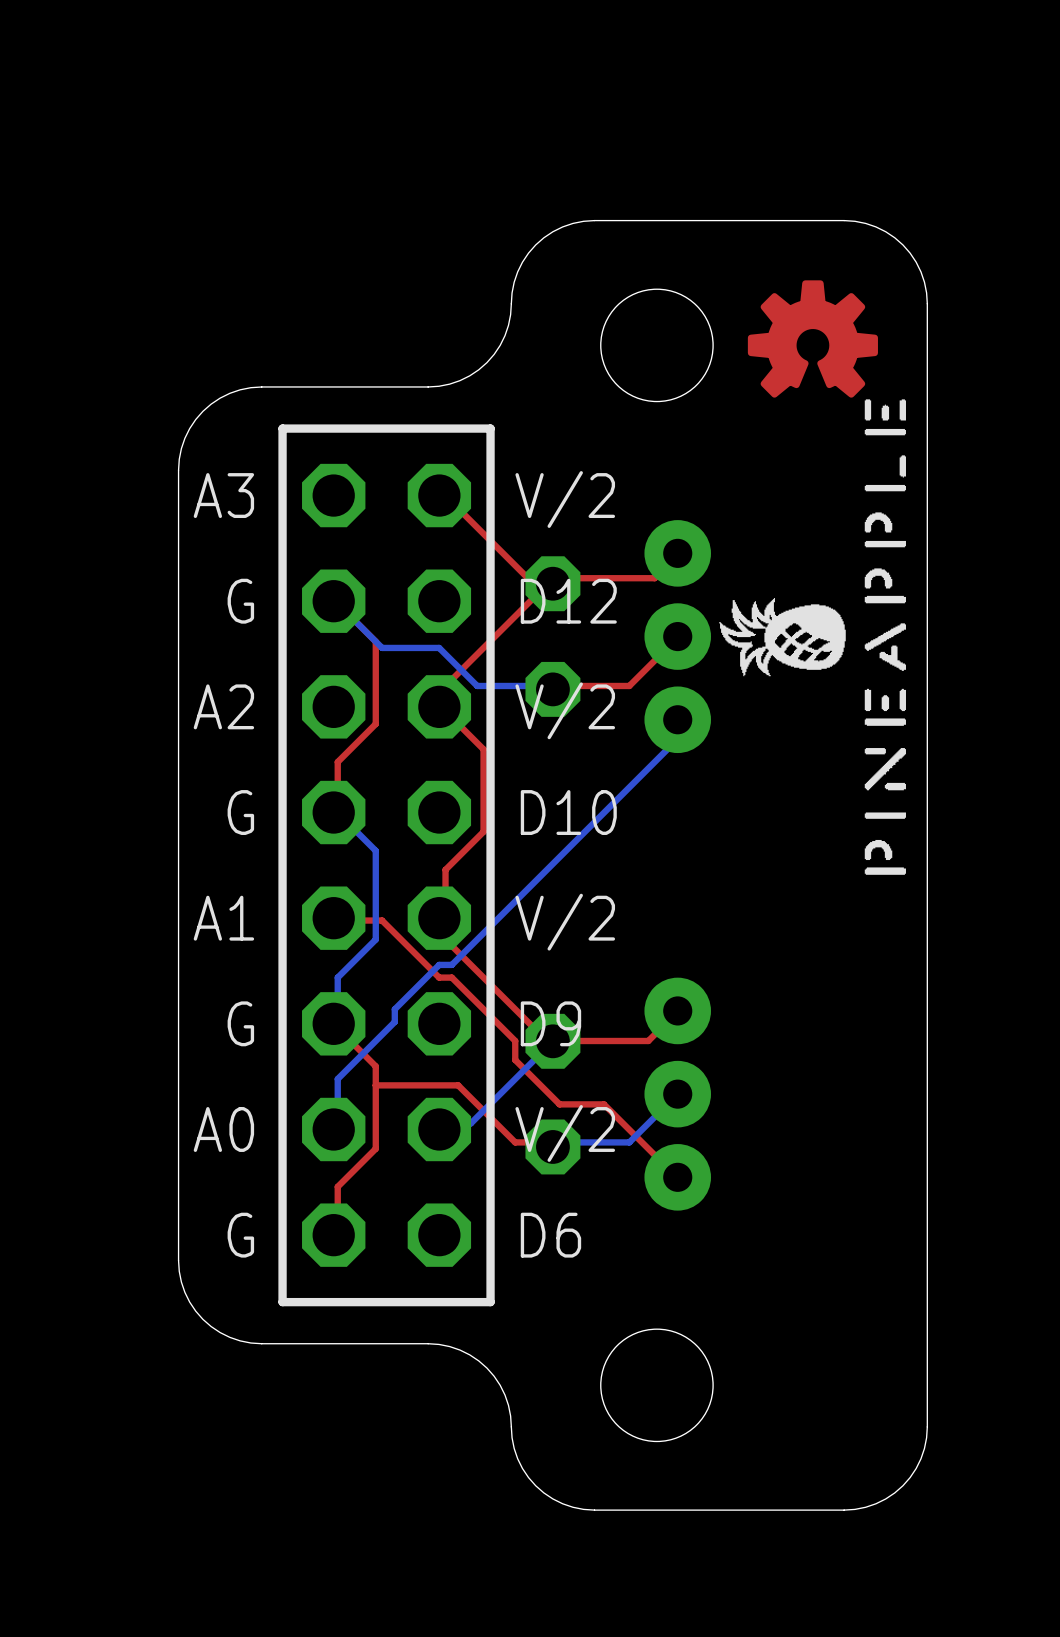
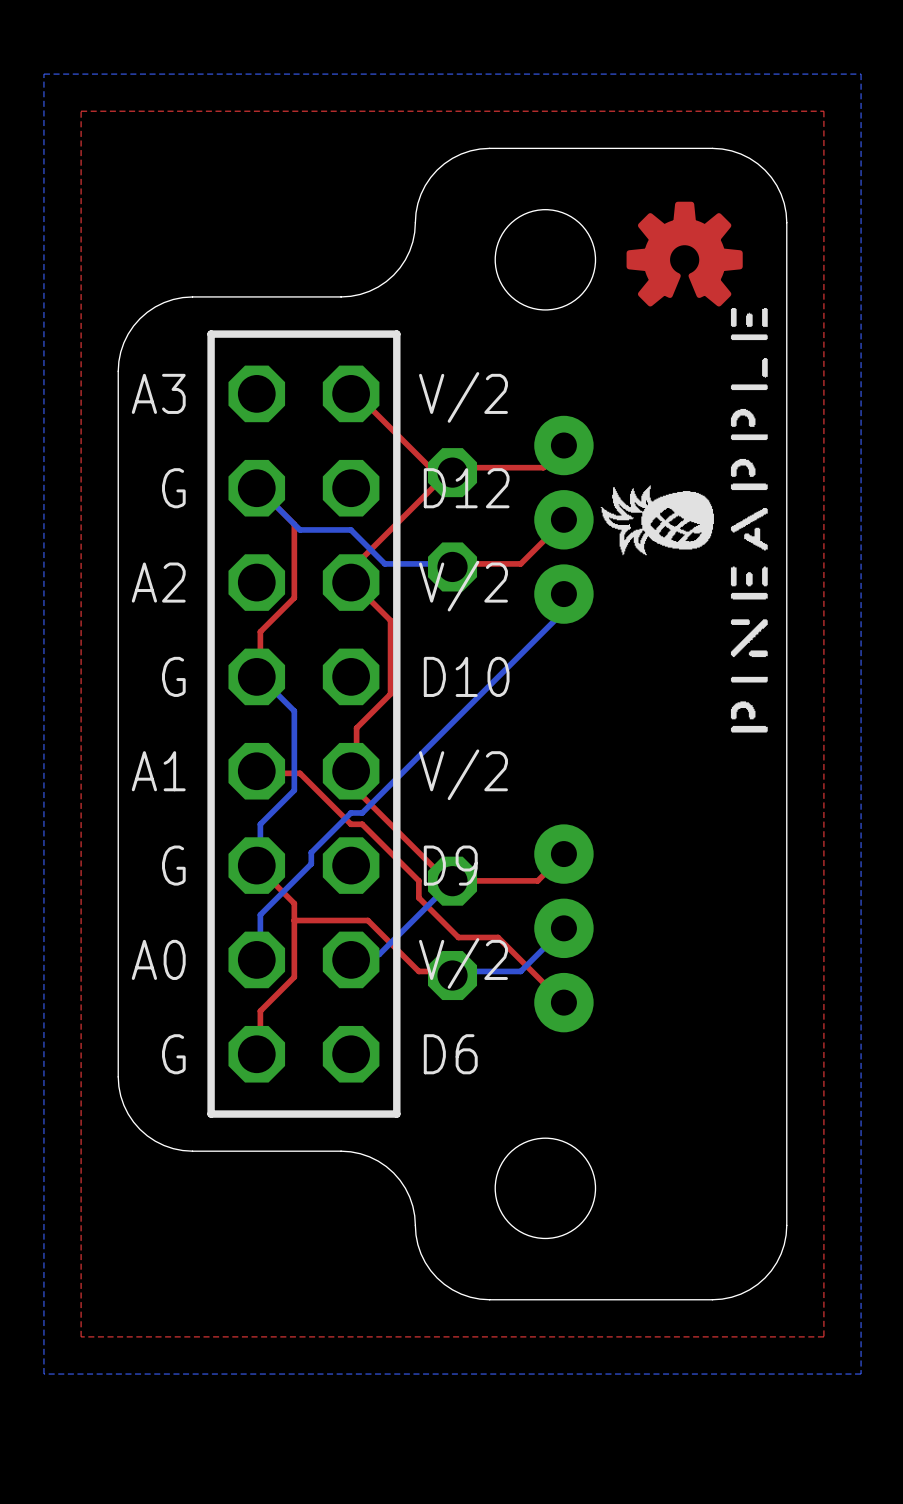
bottom zone outline: none -> (861, 74) (43, 74) (43, 1374) (861, 1374) (861, 74)
top zone outline: none -> (823, 111) (81, 111) (81, 1336) (823, 1336) (823, 111)

